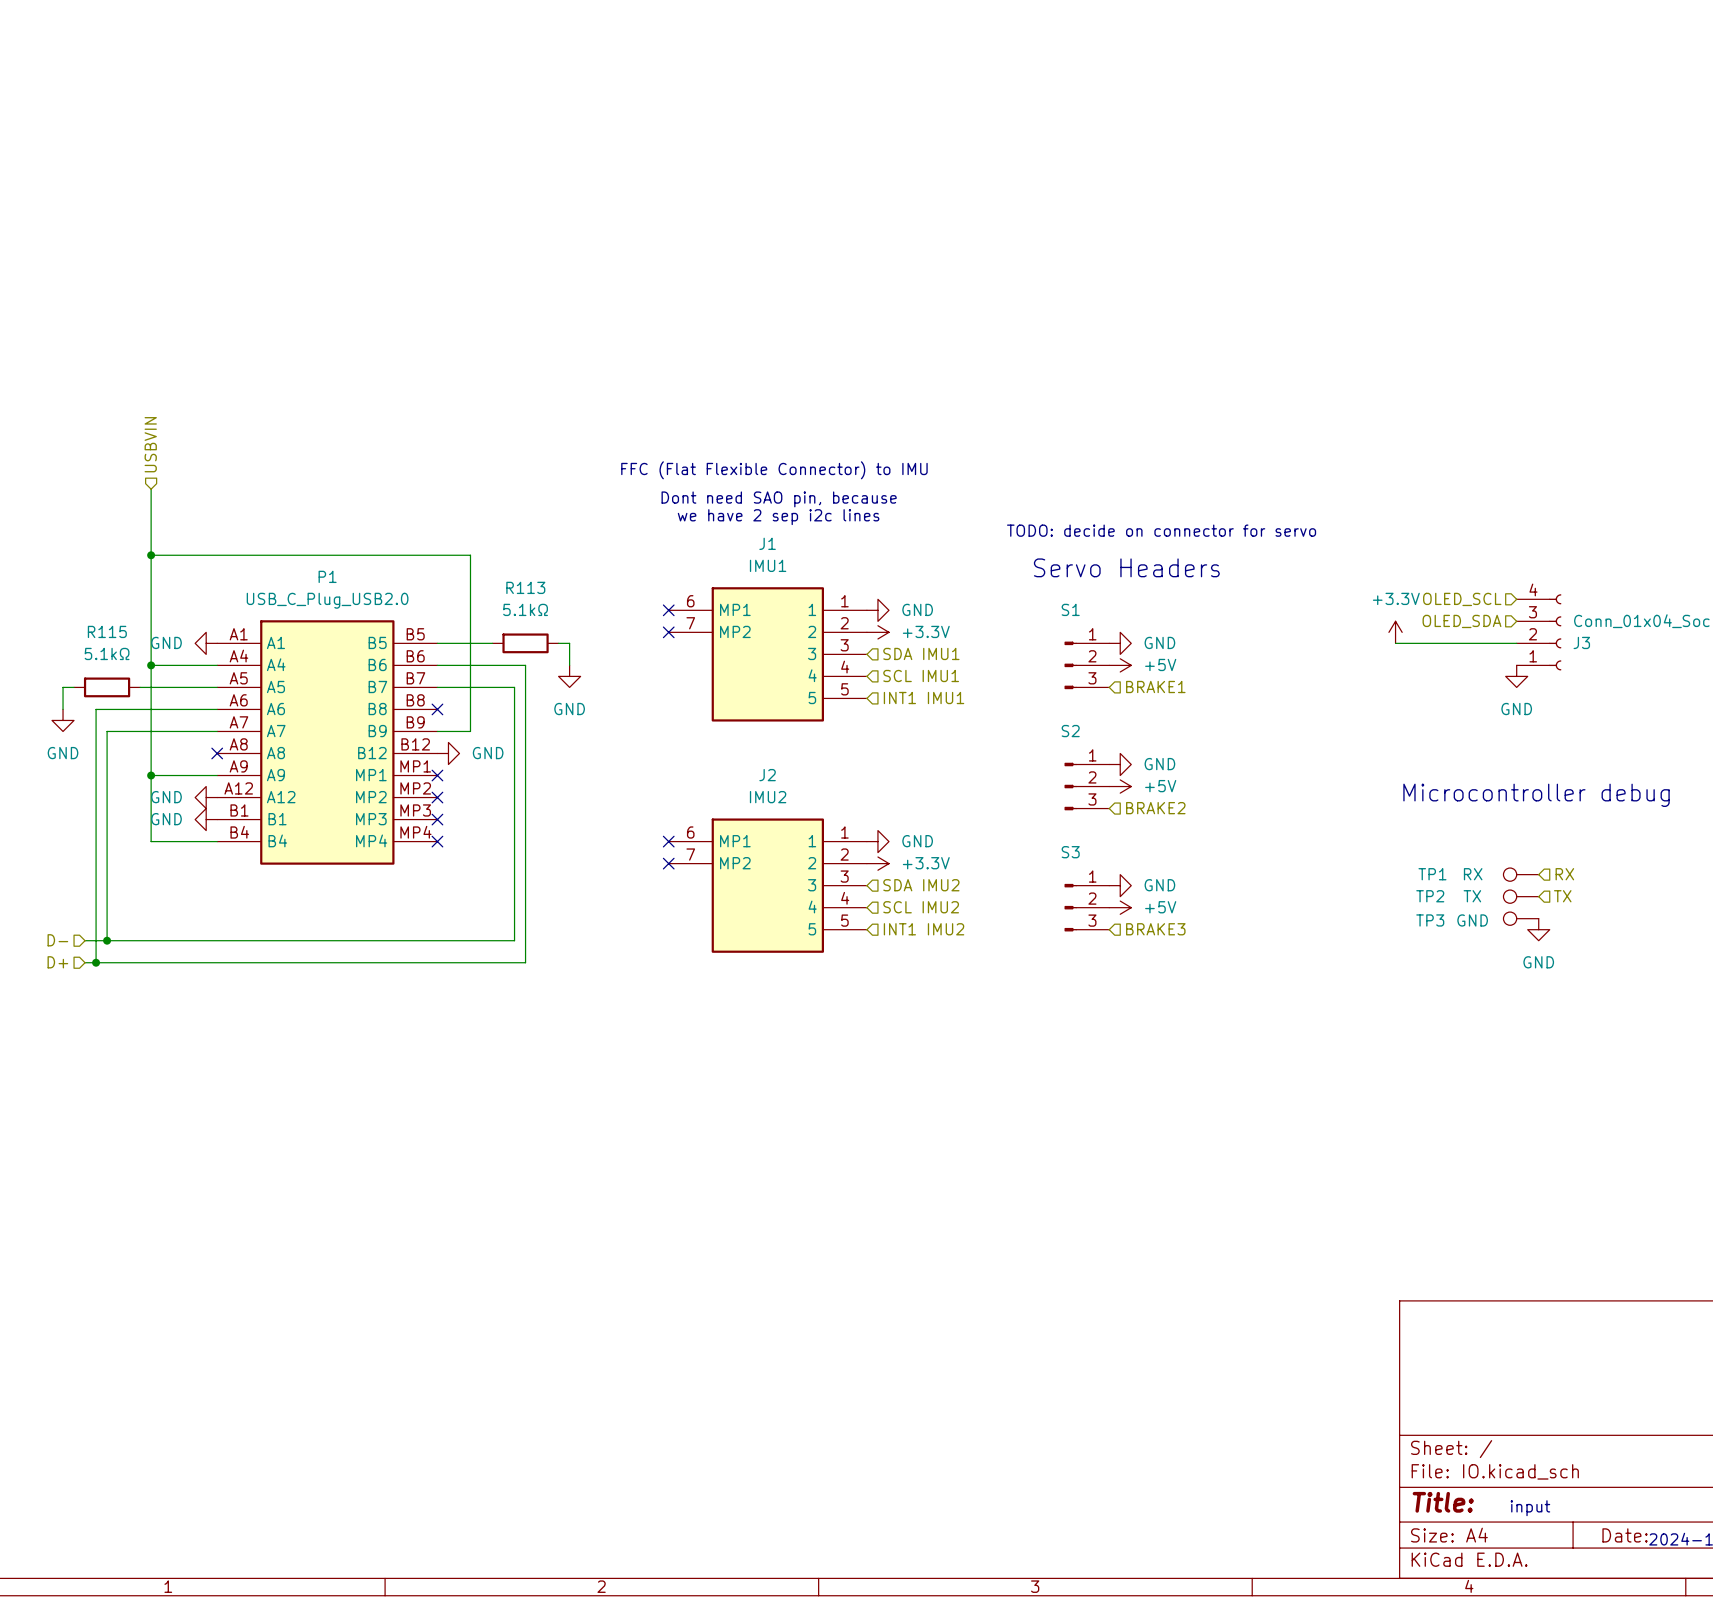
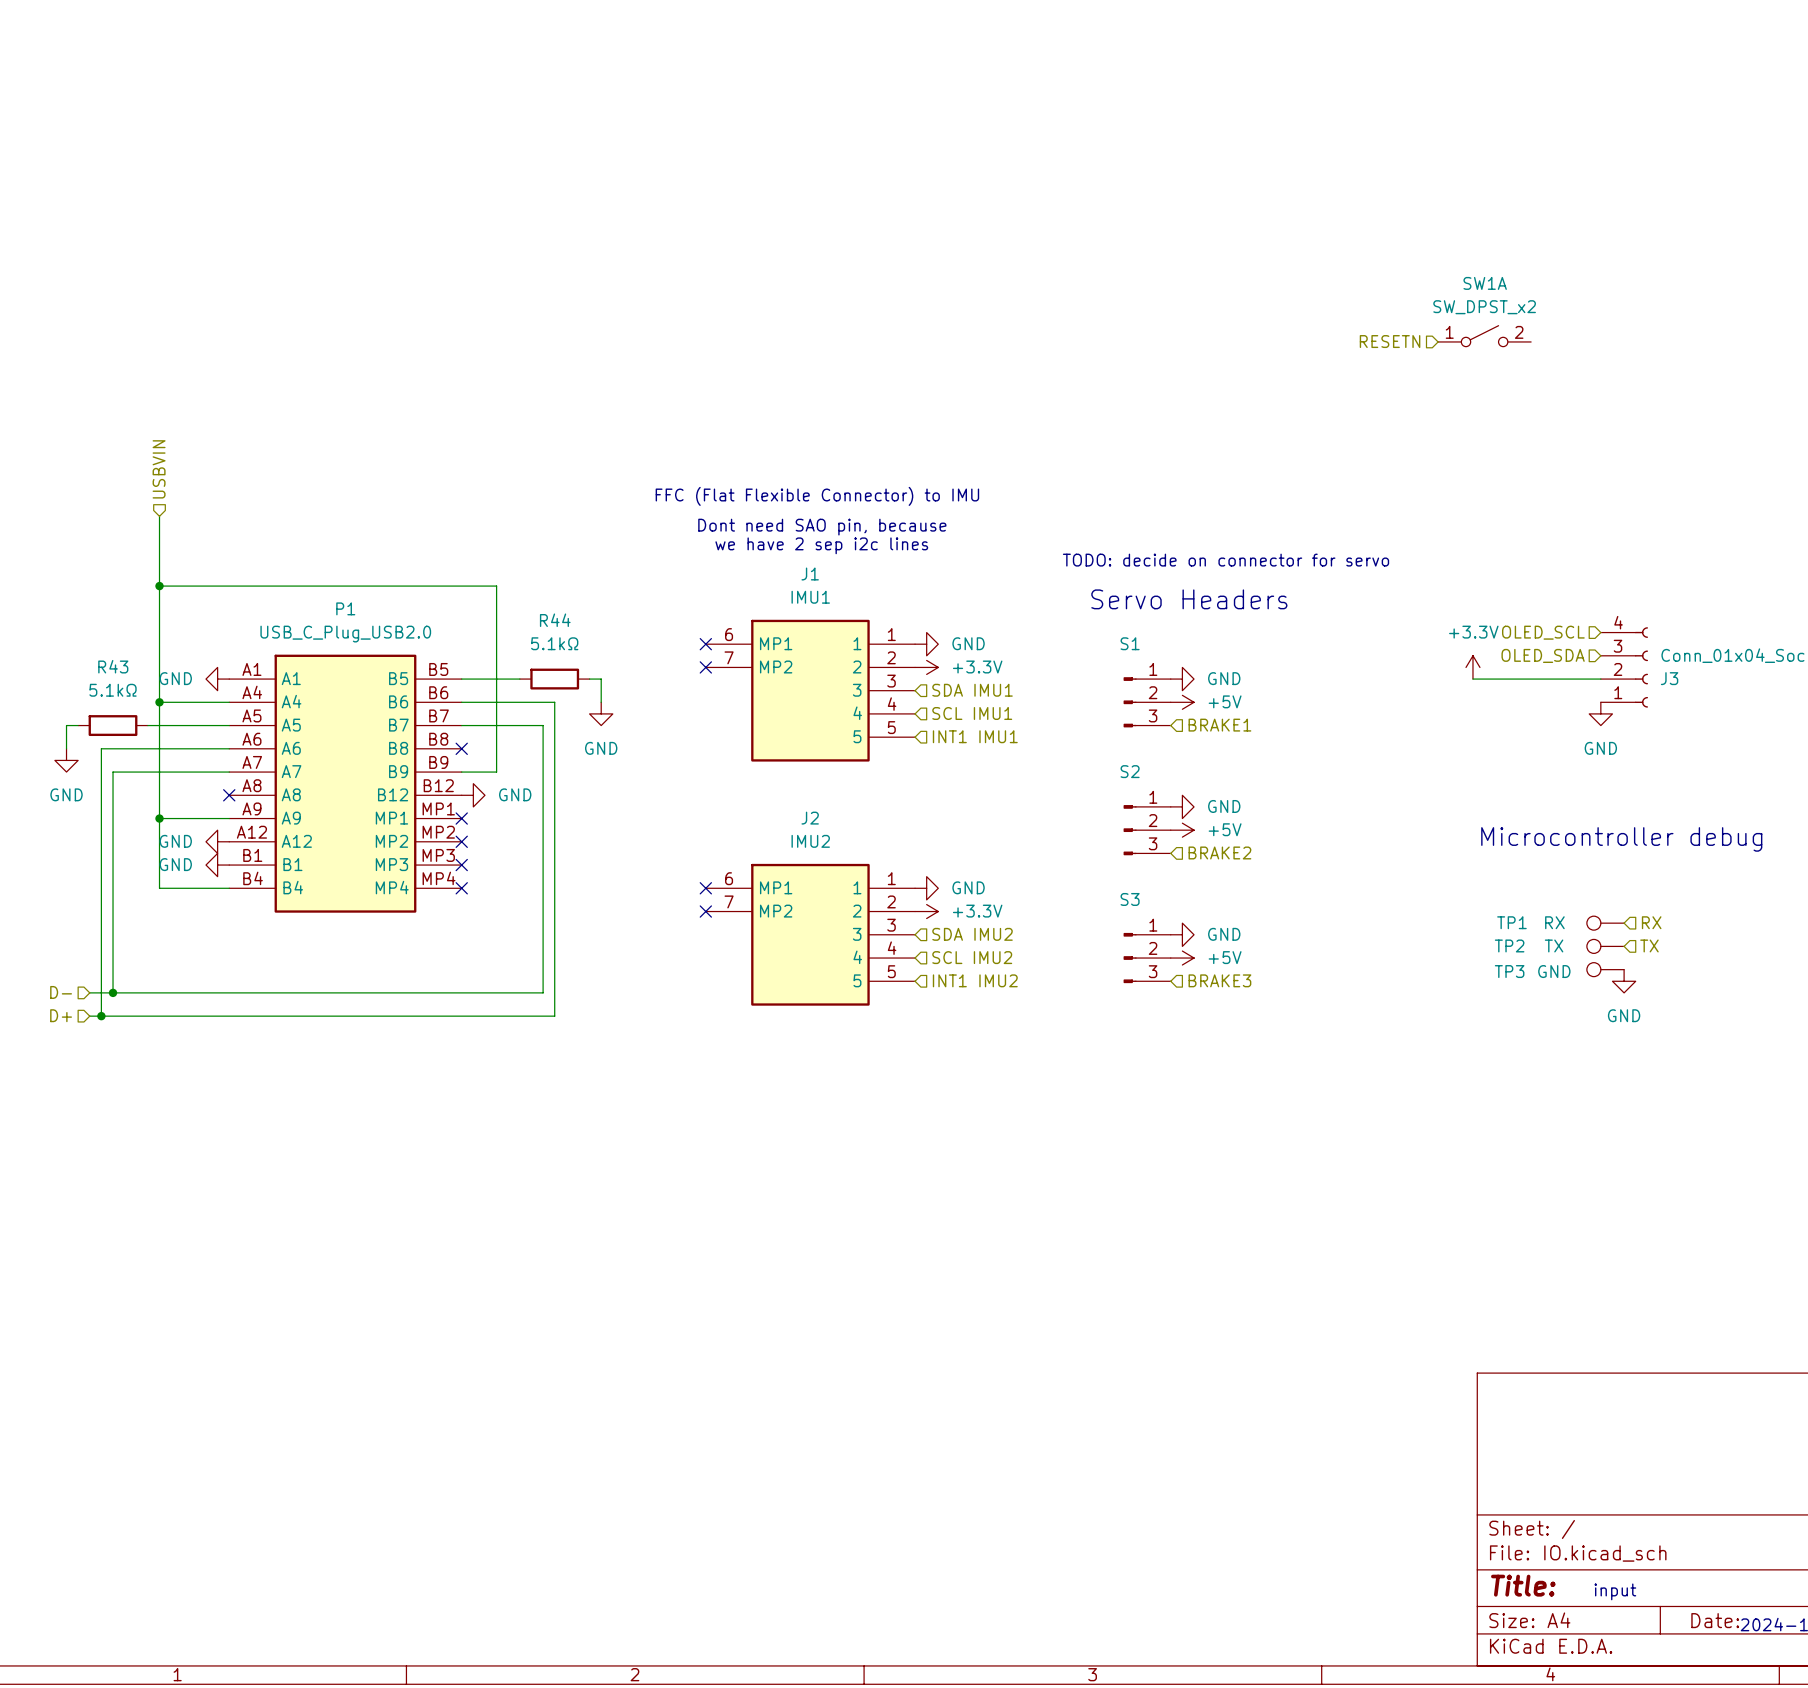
SW1A: none -> SW_DPST_x2 (1484, 336)
hierarchical label: none -> RESETN (1390, 341)
R113 name: R113 (525, 587) -> R44 (555, 620)
R115 name: R115 (107, 631) -> R43 (113, 666)

